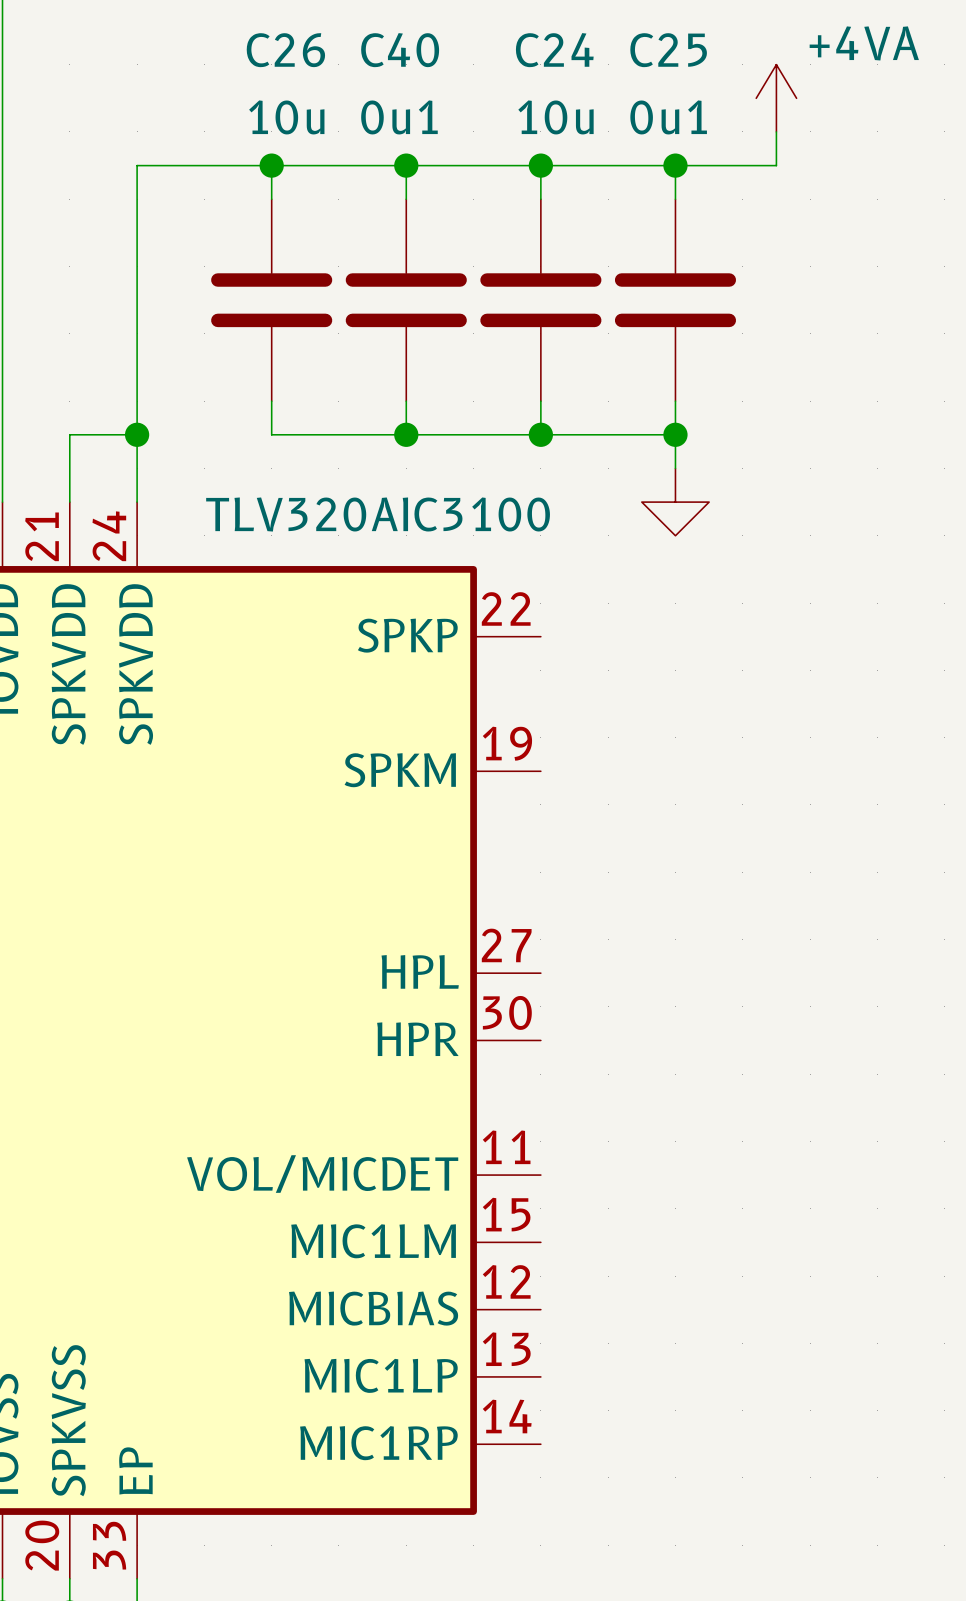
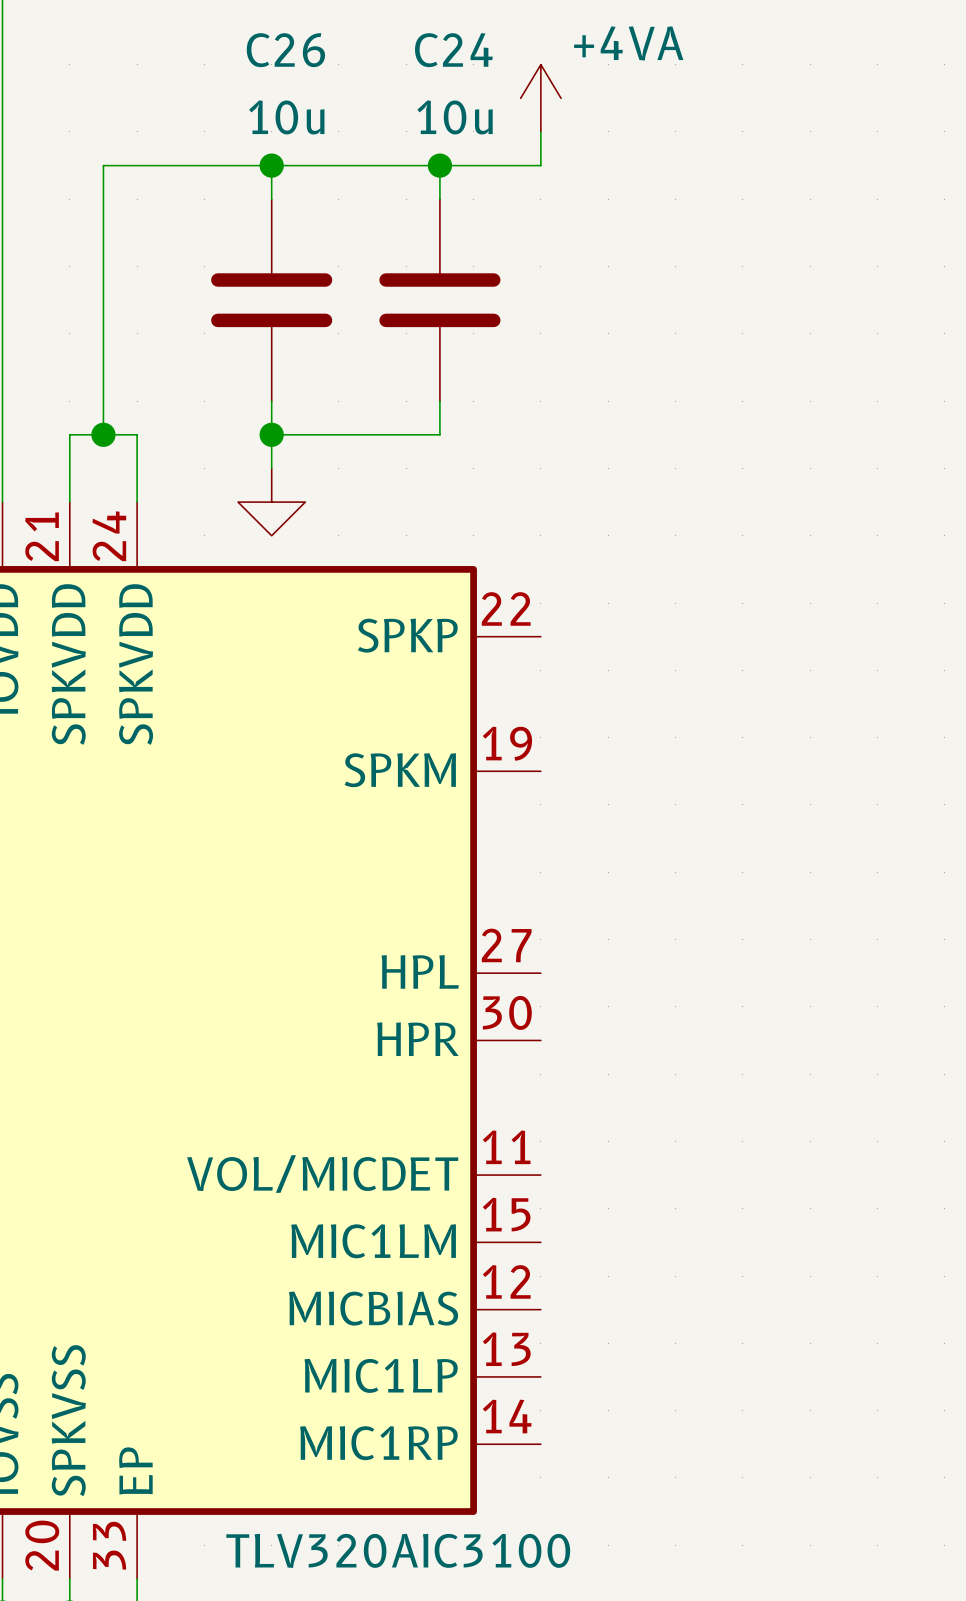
power symbol position: +4VA (776, 98) -> +4VA (540, 98)
wire: (776, 131) (776, 165) (540, 165) (540, 199) -> none
wire: (137, 165) (137, 434) -> (137, 165) (103, 165) (103, 434)
wire: (406, 165) (406, 199) -> (439, 165) (439, 199)
junction position: (406, 165) -> (439, 165)
junction: (540, 165) -> none
wire: (675, 165) (675, 199) -> (540, 131) (540, 165)
junction: (675, 165) -> none
C40: 0u1 (406, 300) -> none
C24 position: (540, 300) -> (439, 300)
C25: 0u1 (675, 300) -> none
wire: (406, 401) (406, 434) -> (271, 434) (271, 468)
wire: (540, 401) (540, 434) -> none
wire: (675, 401) (675, 468) -> none
junction position: (137, 434) -> (103, 434)
junction: none -> (271, 434)
junction: (406, 434) -> none
wire: (439, 434) (675, 434) -> (439, 434) (439, 401)
junction: (540, 434) -> none
junction: (675, 434) -> none
power symbol: none -> (271, 502)
power symbol: (675, 502) -> none
part value position: TLV320AIC3100 (378, 514) -> TLV320AIC3100 (398, 1550)

